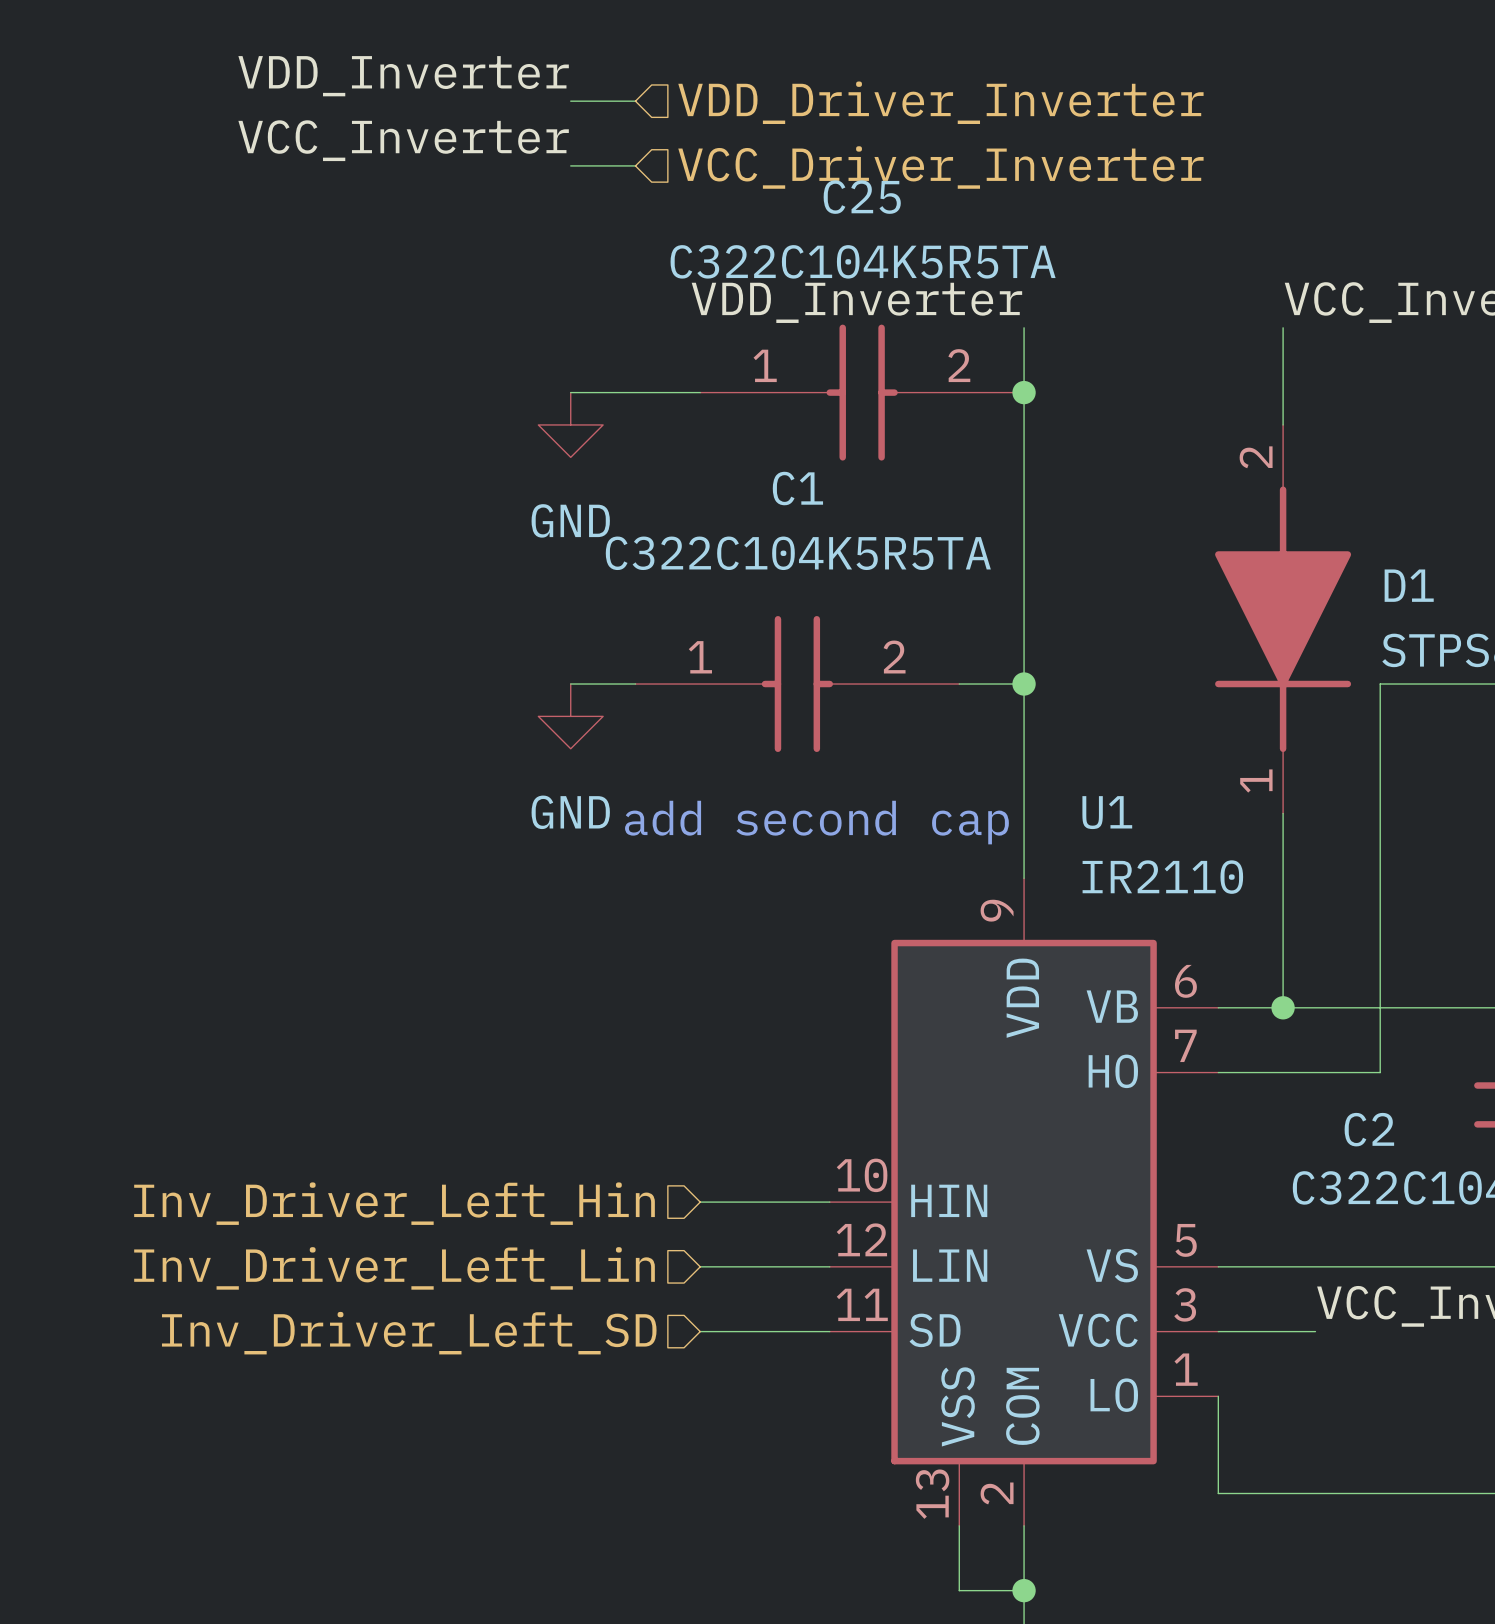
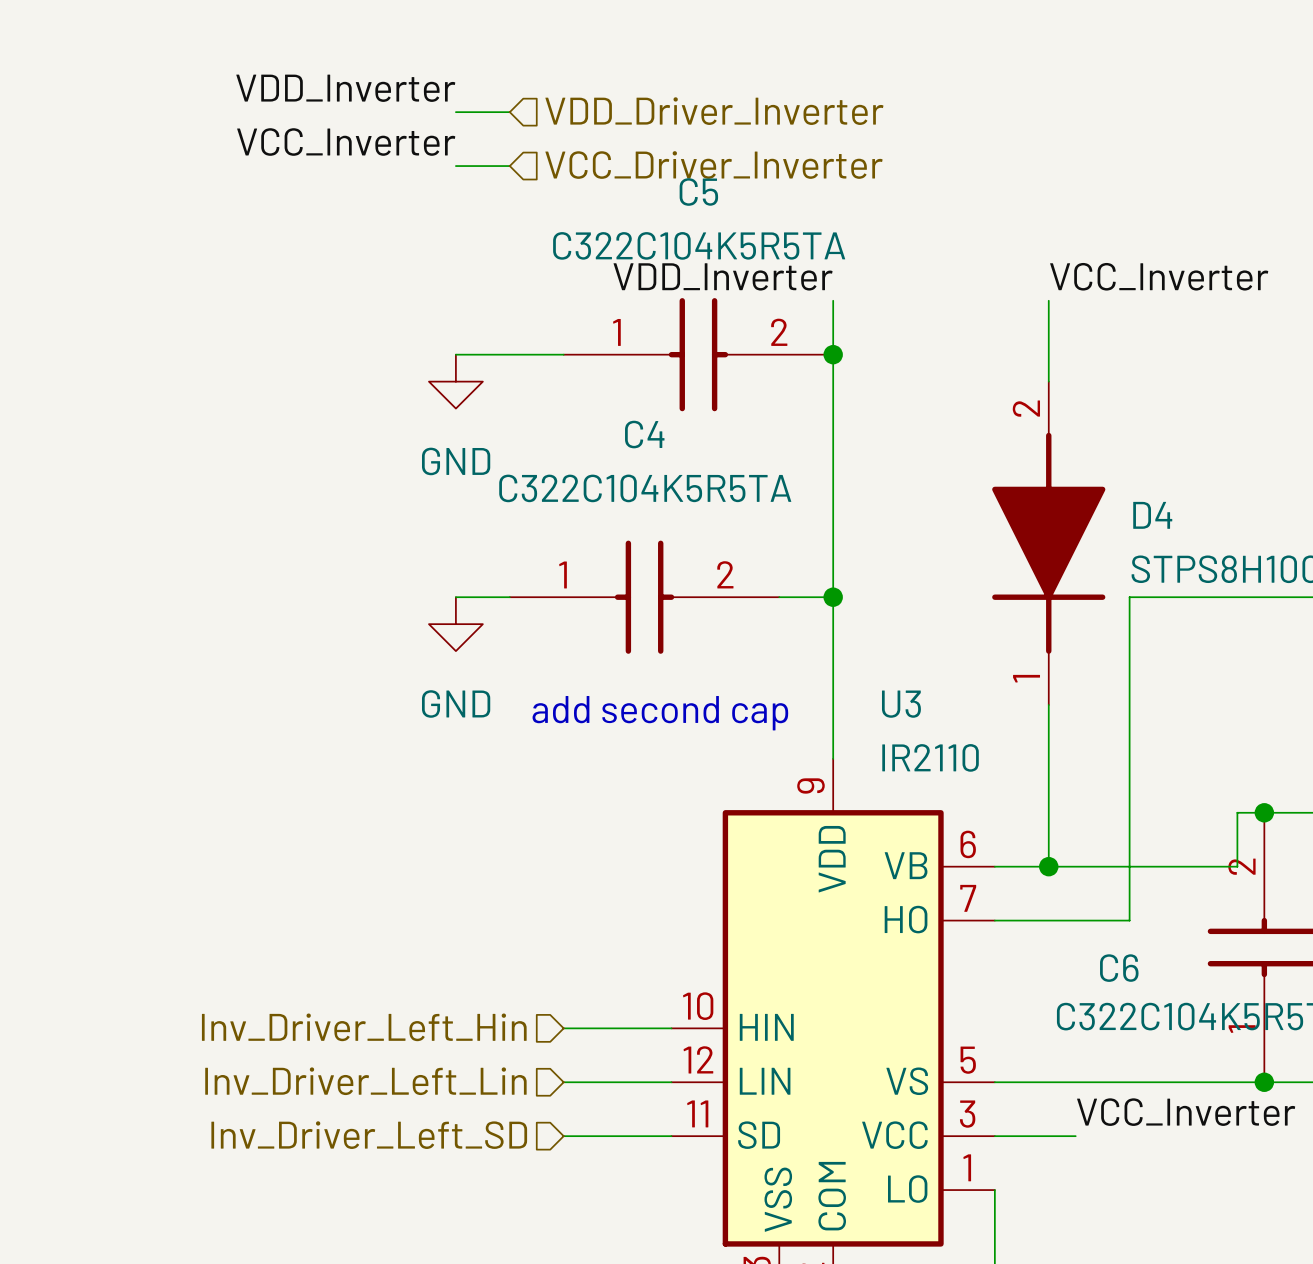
C25 name: C25 (862, 197) -> C5 (698, 192)
C1 name: C1 (797, 488) -> C4 (644, 434)
D1 name: D1 (1409, 585) -> D4 (1152, 515)
U1 name: U1 (1107, 812) -> U3 (901, 704)
C2 name: C2 (1369, 1129) -> C6 (1119, 968)

